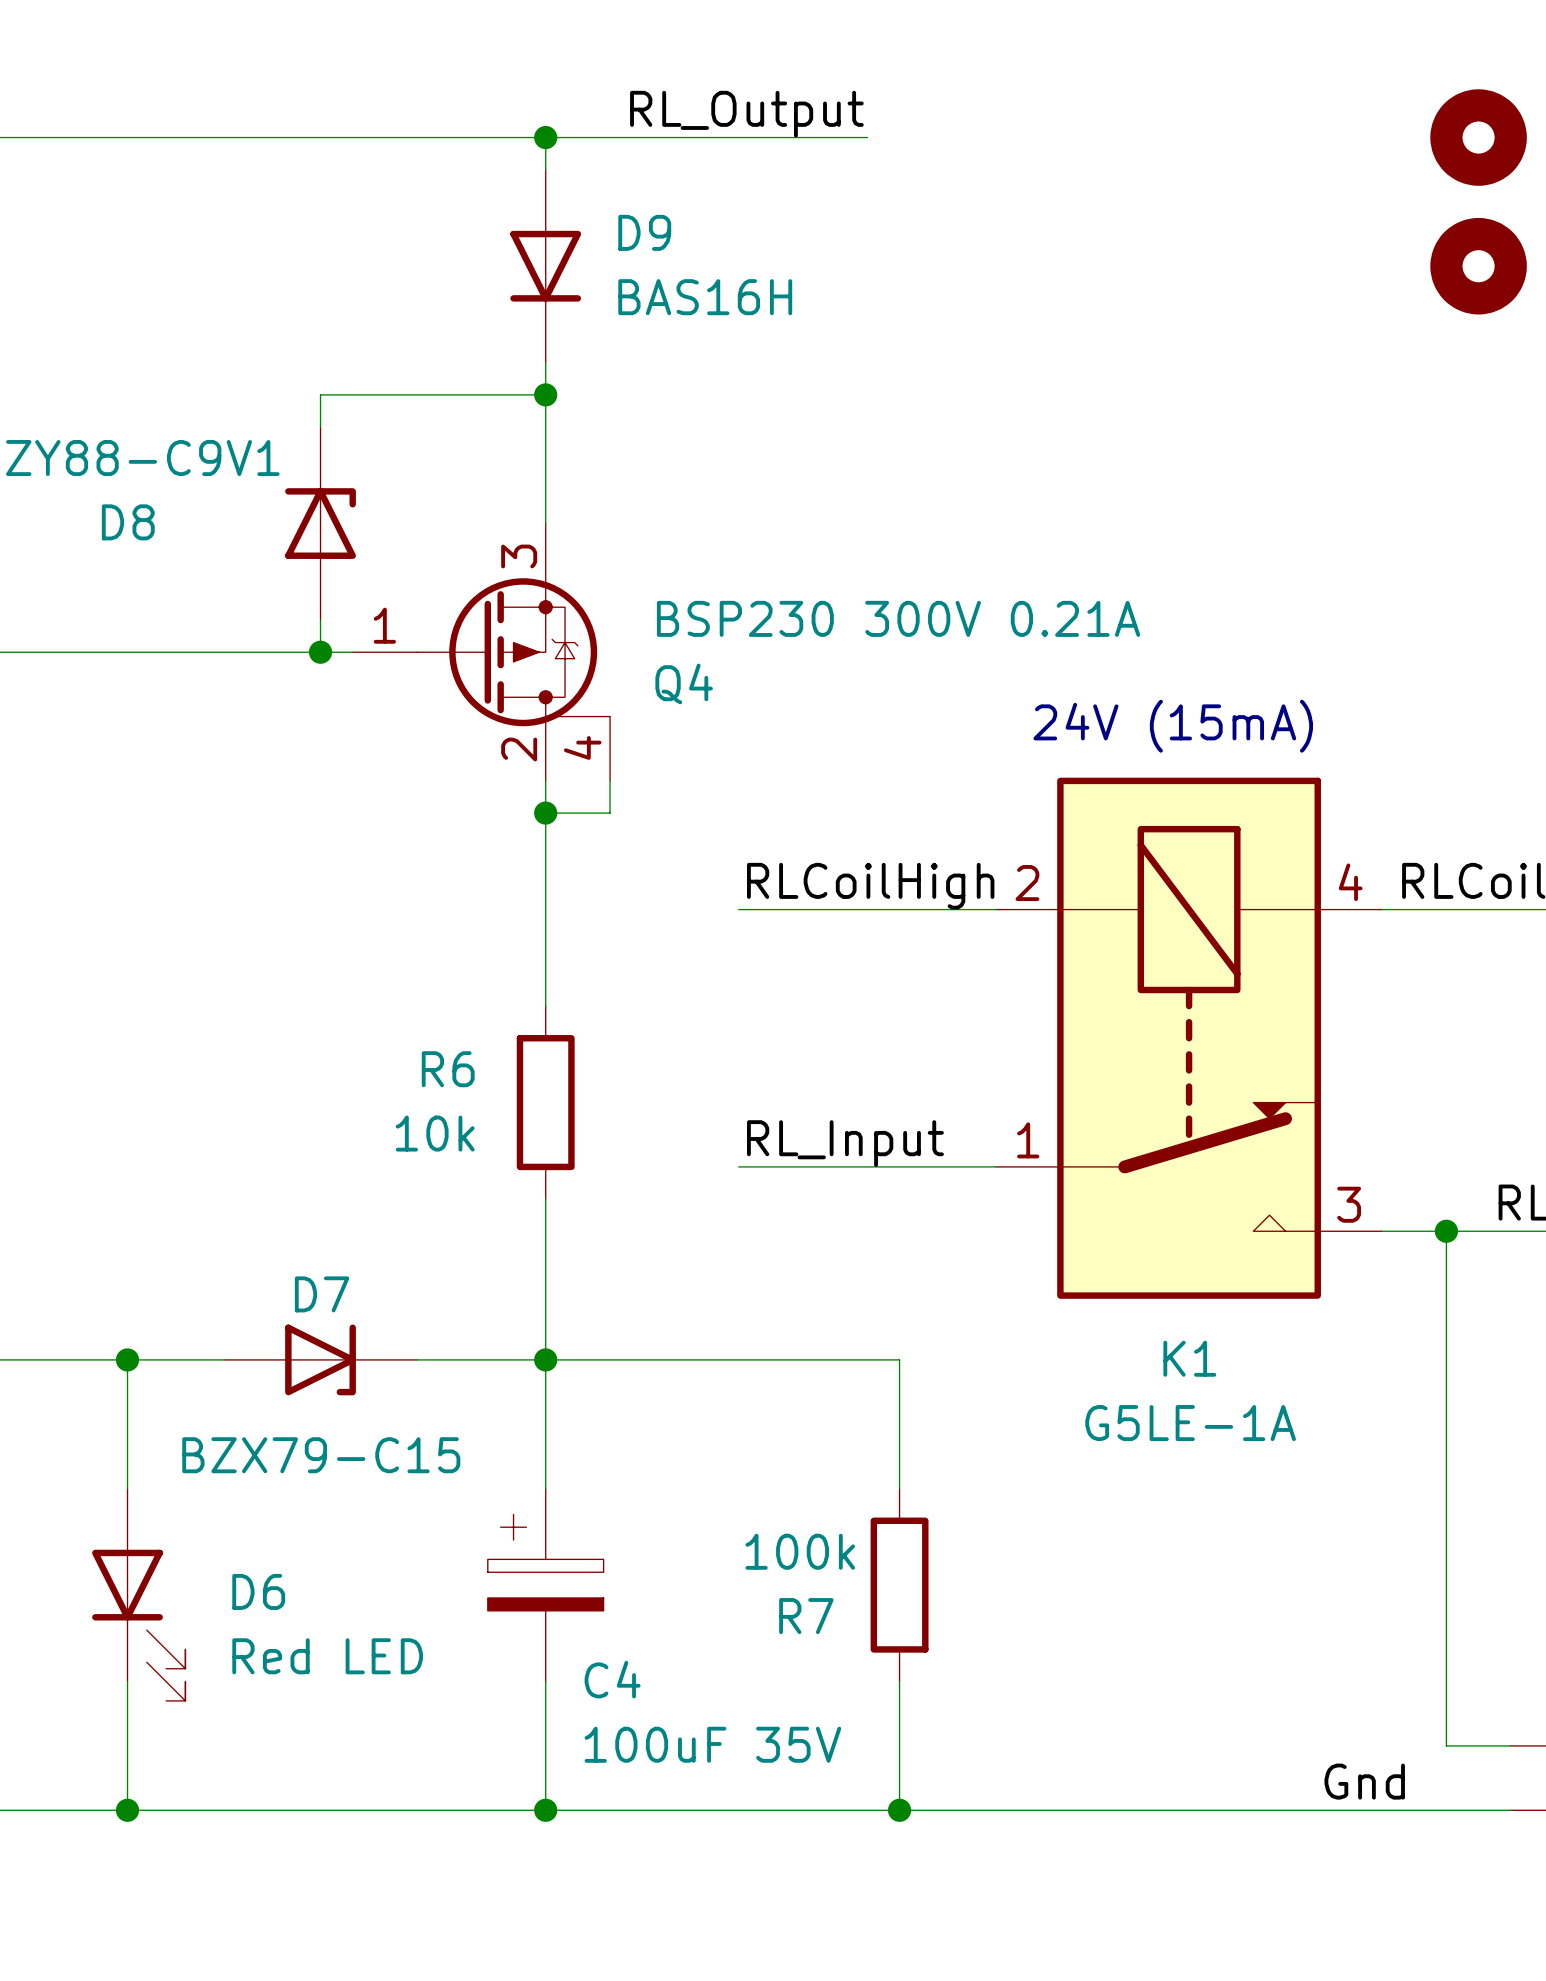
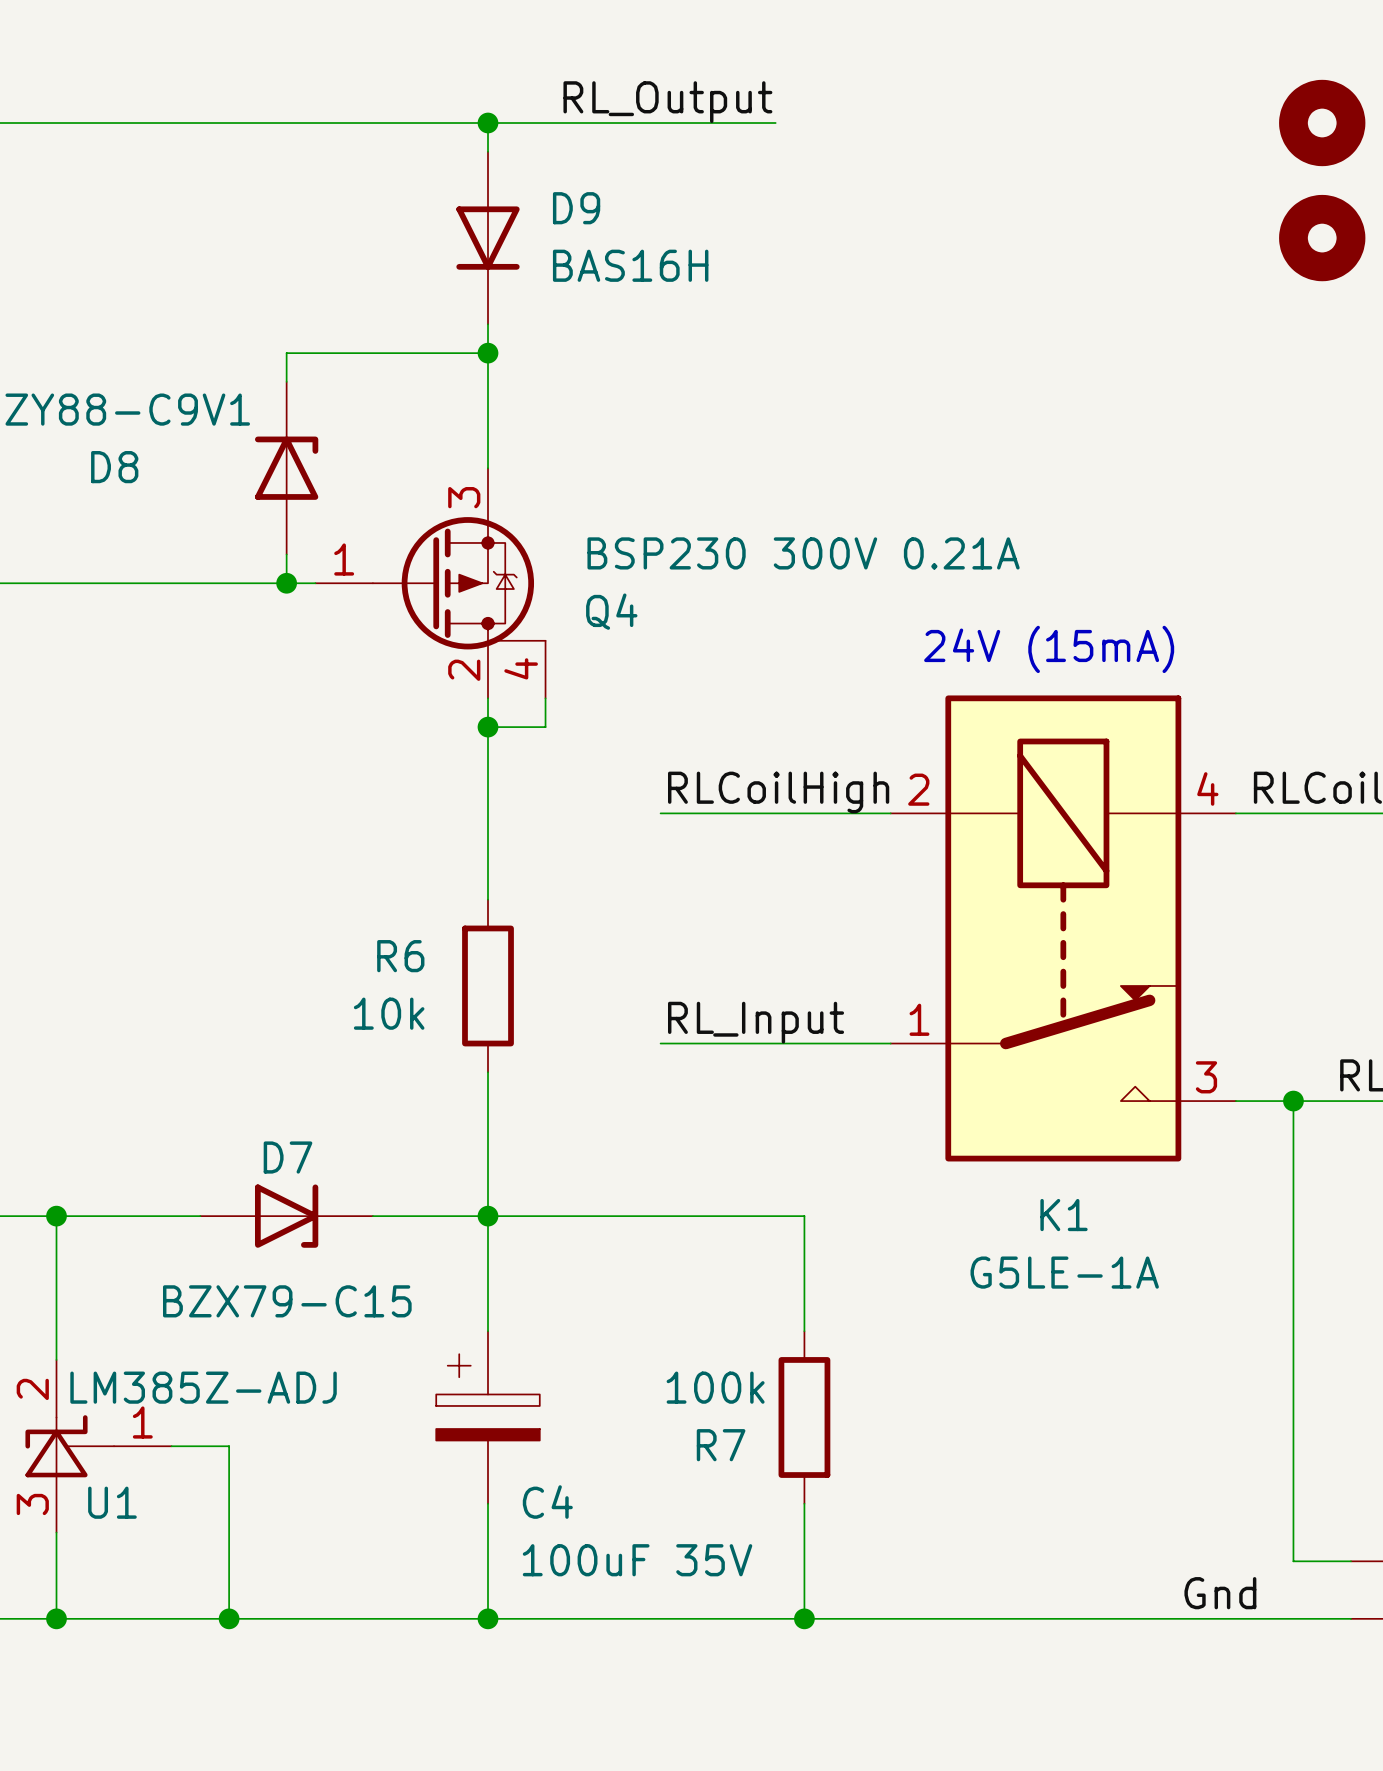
wire: none -> (56, 1216) (56, 1359)
wire: (127, 1359) (127, 1488) -> none
junction position: (127, 1359) -> (56, 1216)
D6: Red LED (138, 1594) -> none
U1: none -> LM385Z-ADJ (98, 1446)
wire: none -> (171, 1446) (229, 1446) (229, 1618)
wire: (127, 1681) (127, 1810) -> none
wire: none -> (56, 1532) (56, 1618)
junction: none -> (56, 1618)
junction: (127, 1810) -> none
junction: none -> (229, 1618)

